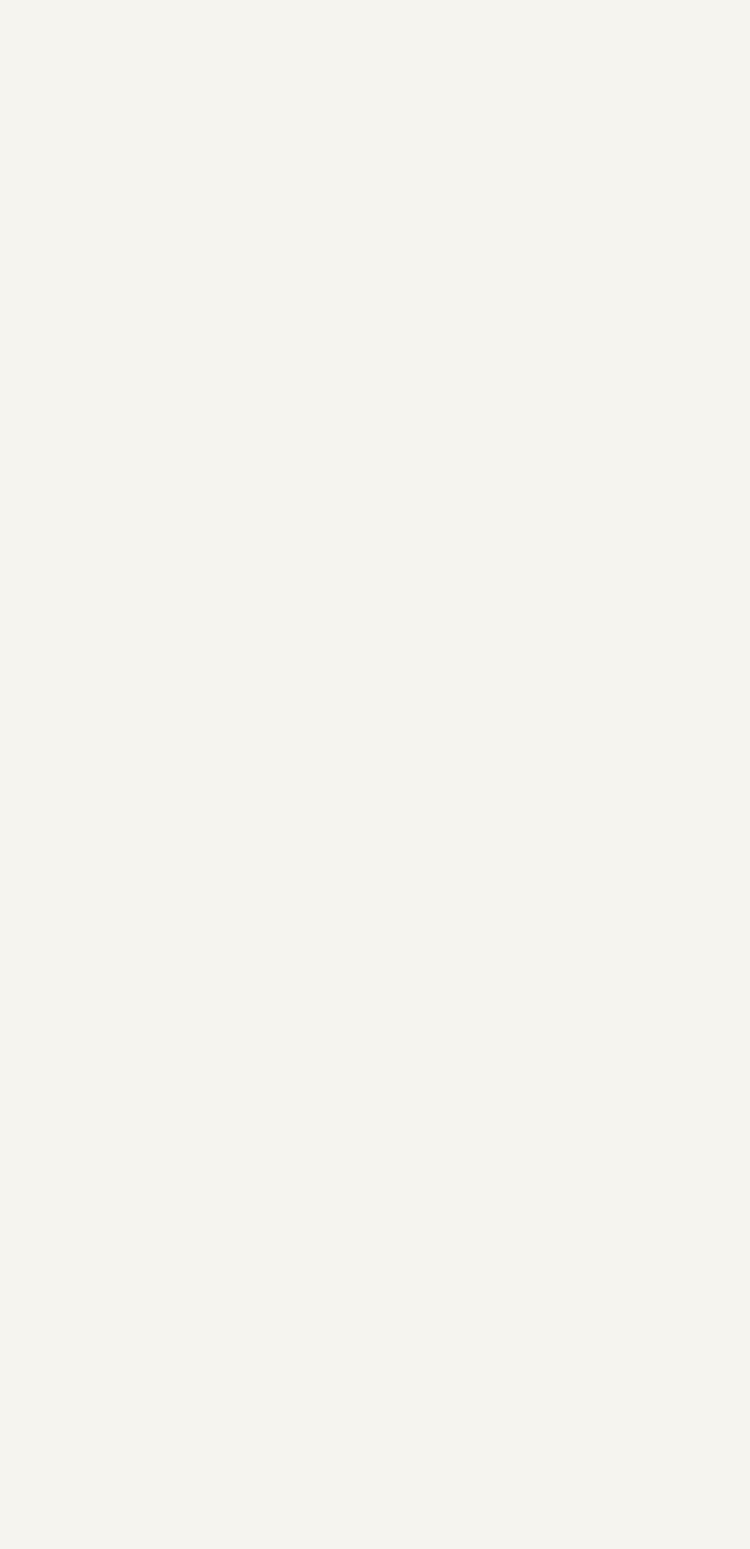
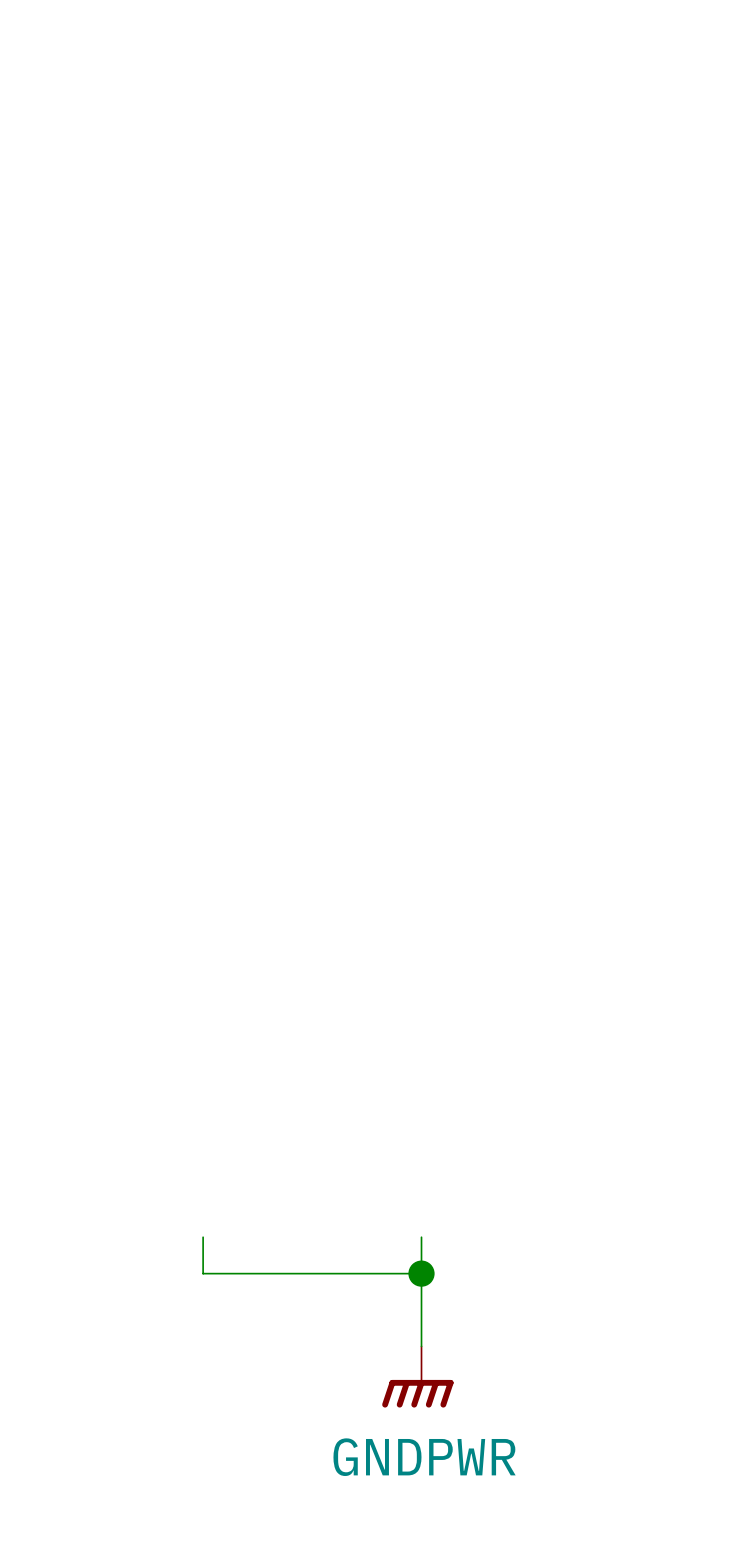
wire: none -> (203, 1237) (203, 1273) (421, 1273)
wire: none -> (421, 1237) (421, 1346)
junction: none -> (421, 1273)
power symbol: none -> GNDPWR (417, 1377)

